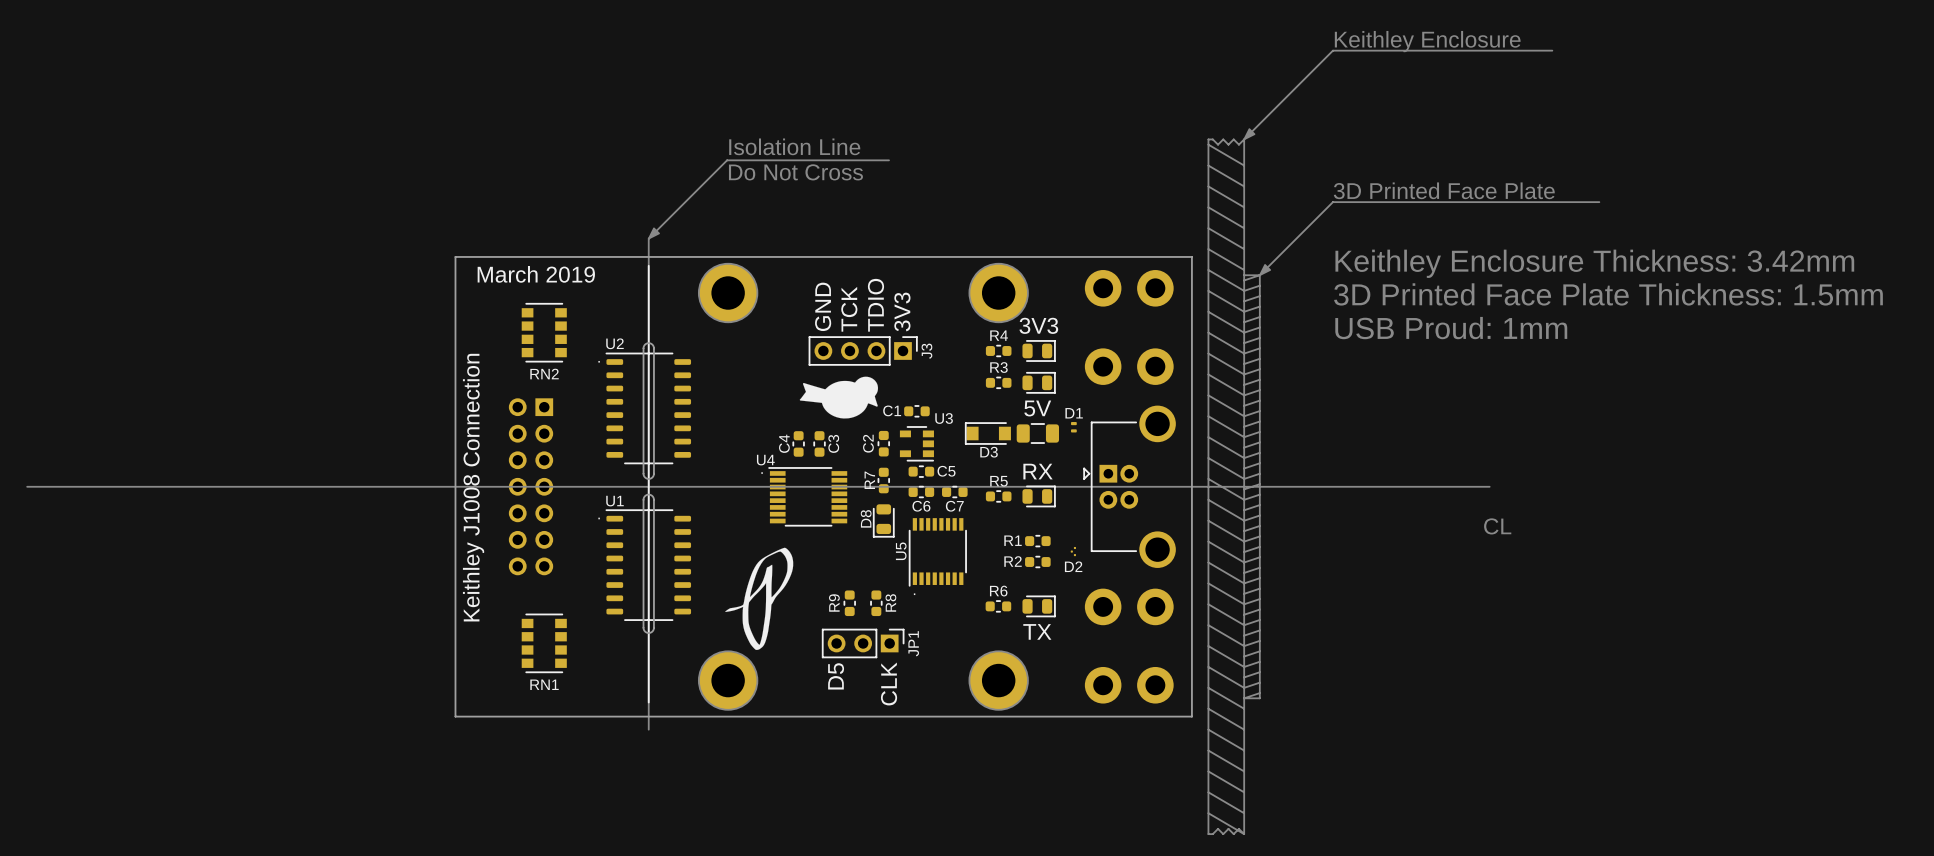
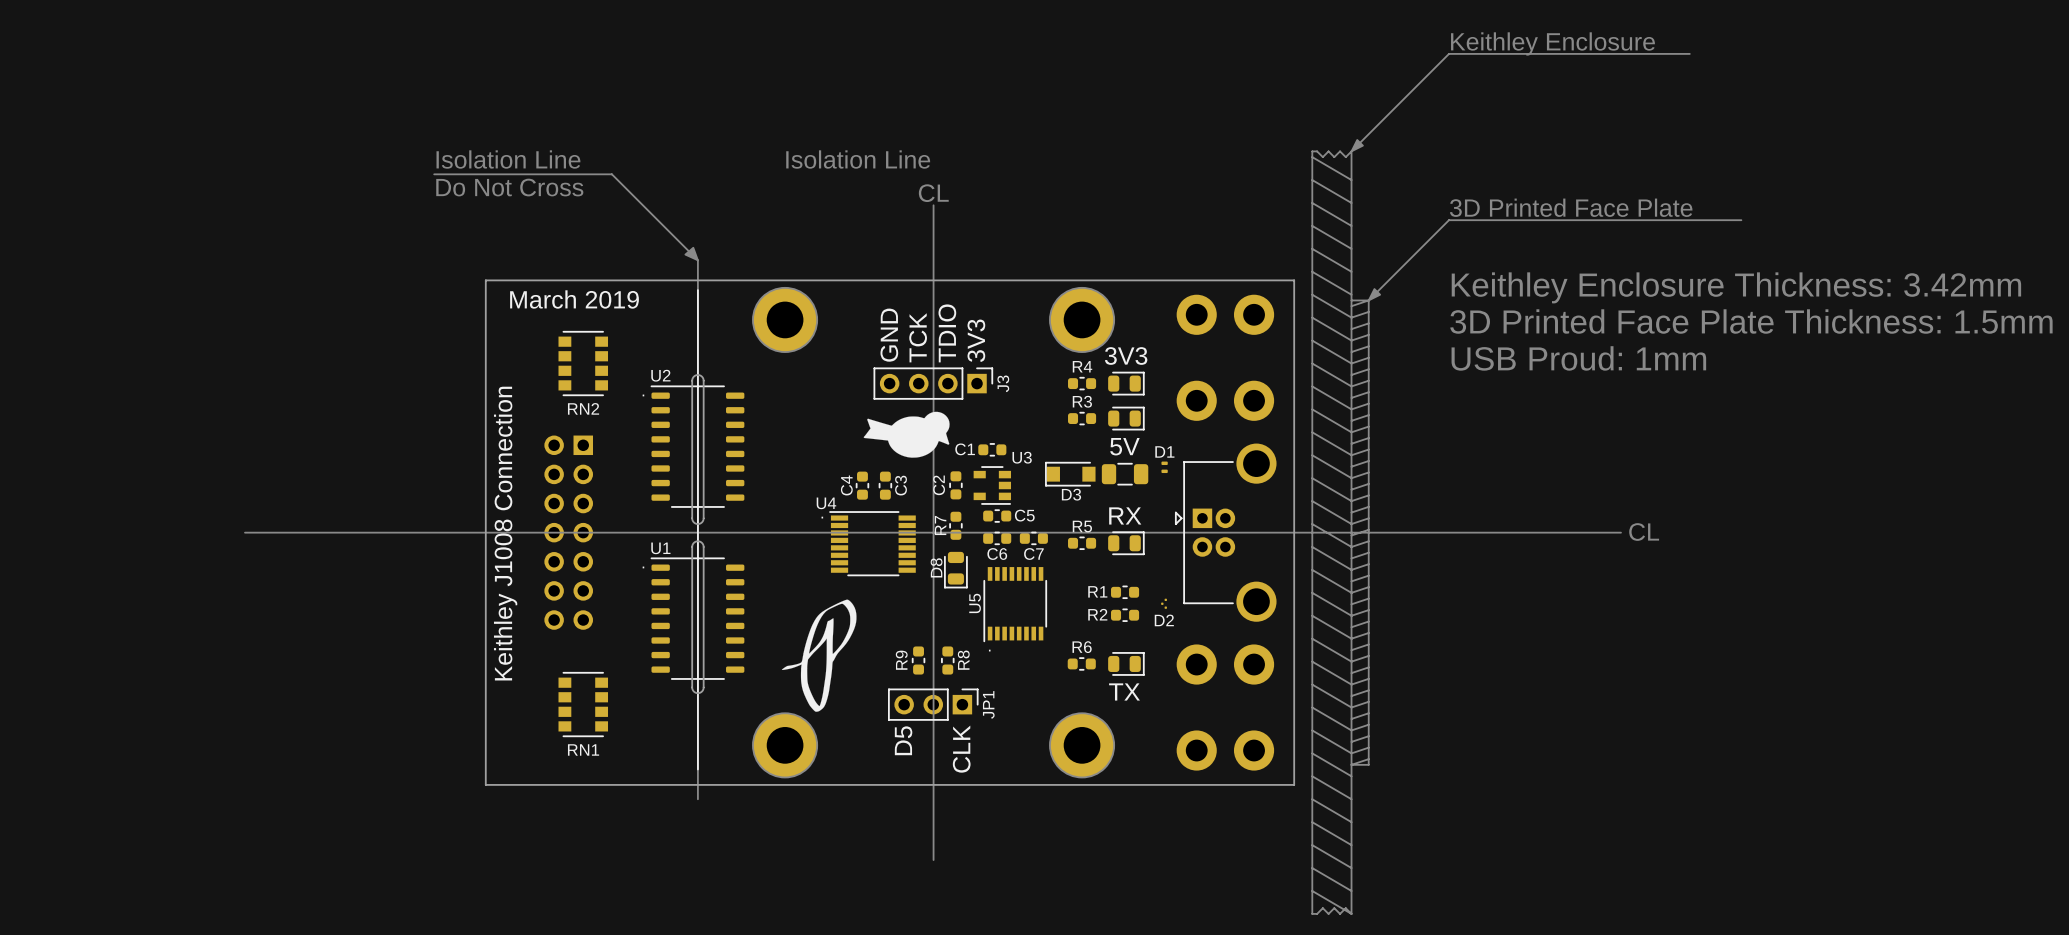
text: none -> Isolation Line (508, 159)
line: (889, 160) (727, 160) (648, 238) -> (434, 174) (611, 174) (697, 260)
text: none -> Do Not Cross (509, 187)
text: Do Not Cross (795, 172) -> none
text: none -> CL (933, 193)
line: none -> (933, 205) (933, 860)
drawing: none -> [684, 246, 699, 262]
drawing: [647, 227, 660, 240] -> none
line: (27, 486) (236, 486) -> none
text position: CL (1497, 526) -> CL (1644, 532)

